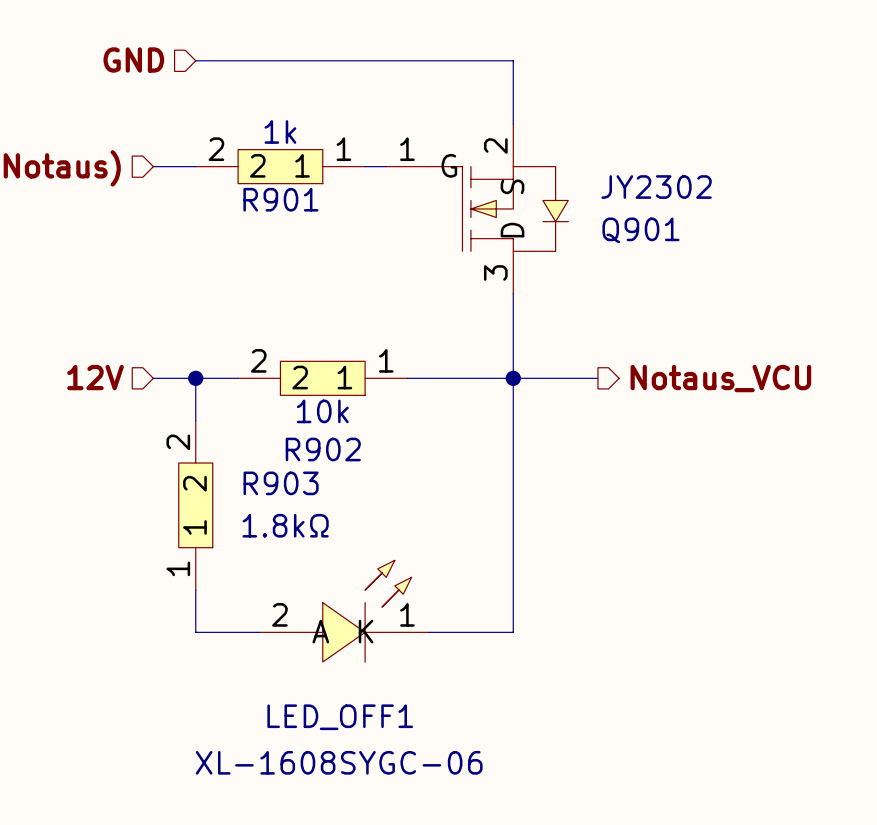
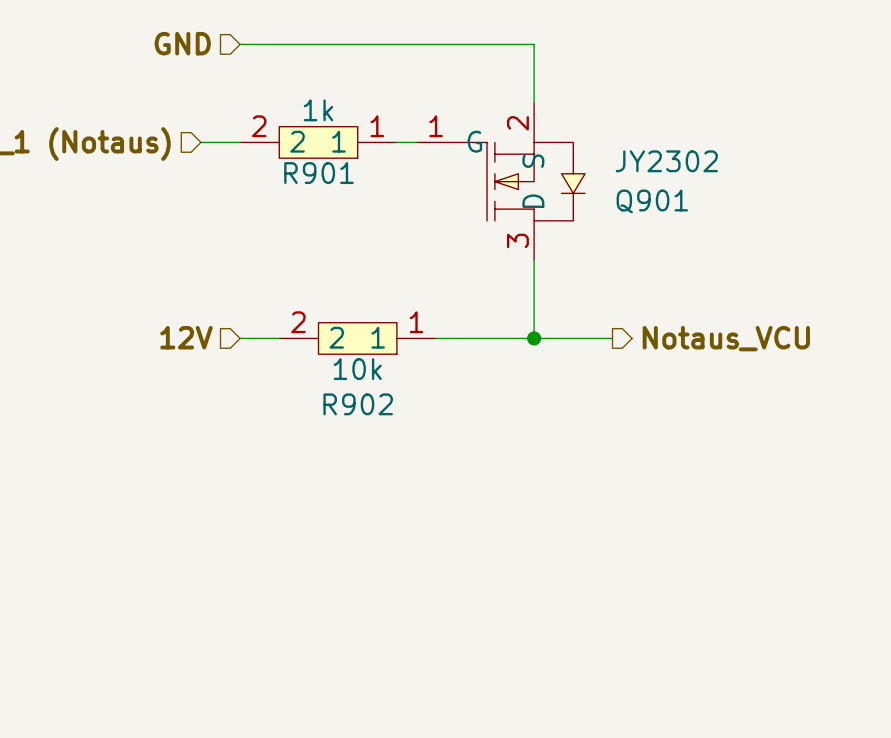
hierarchical label position: 12V (95, 377) -> 12V (186, 337)
wire: (153, 378) (195, 378) (195, 420) -> none
junction: (195, 378) -> none
wire: (513, 378) (513, 632) (428, 632) -> none
R903: 1.8kΩ (195, 505) -> none
wire: (195, 590) (195, 632) (259, 632) -> none
LED_OFF1: XL-1608SYGC-06 (343, 611) -> none

